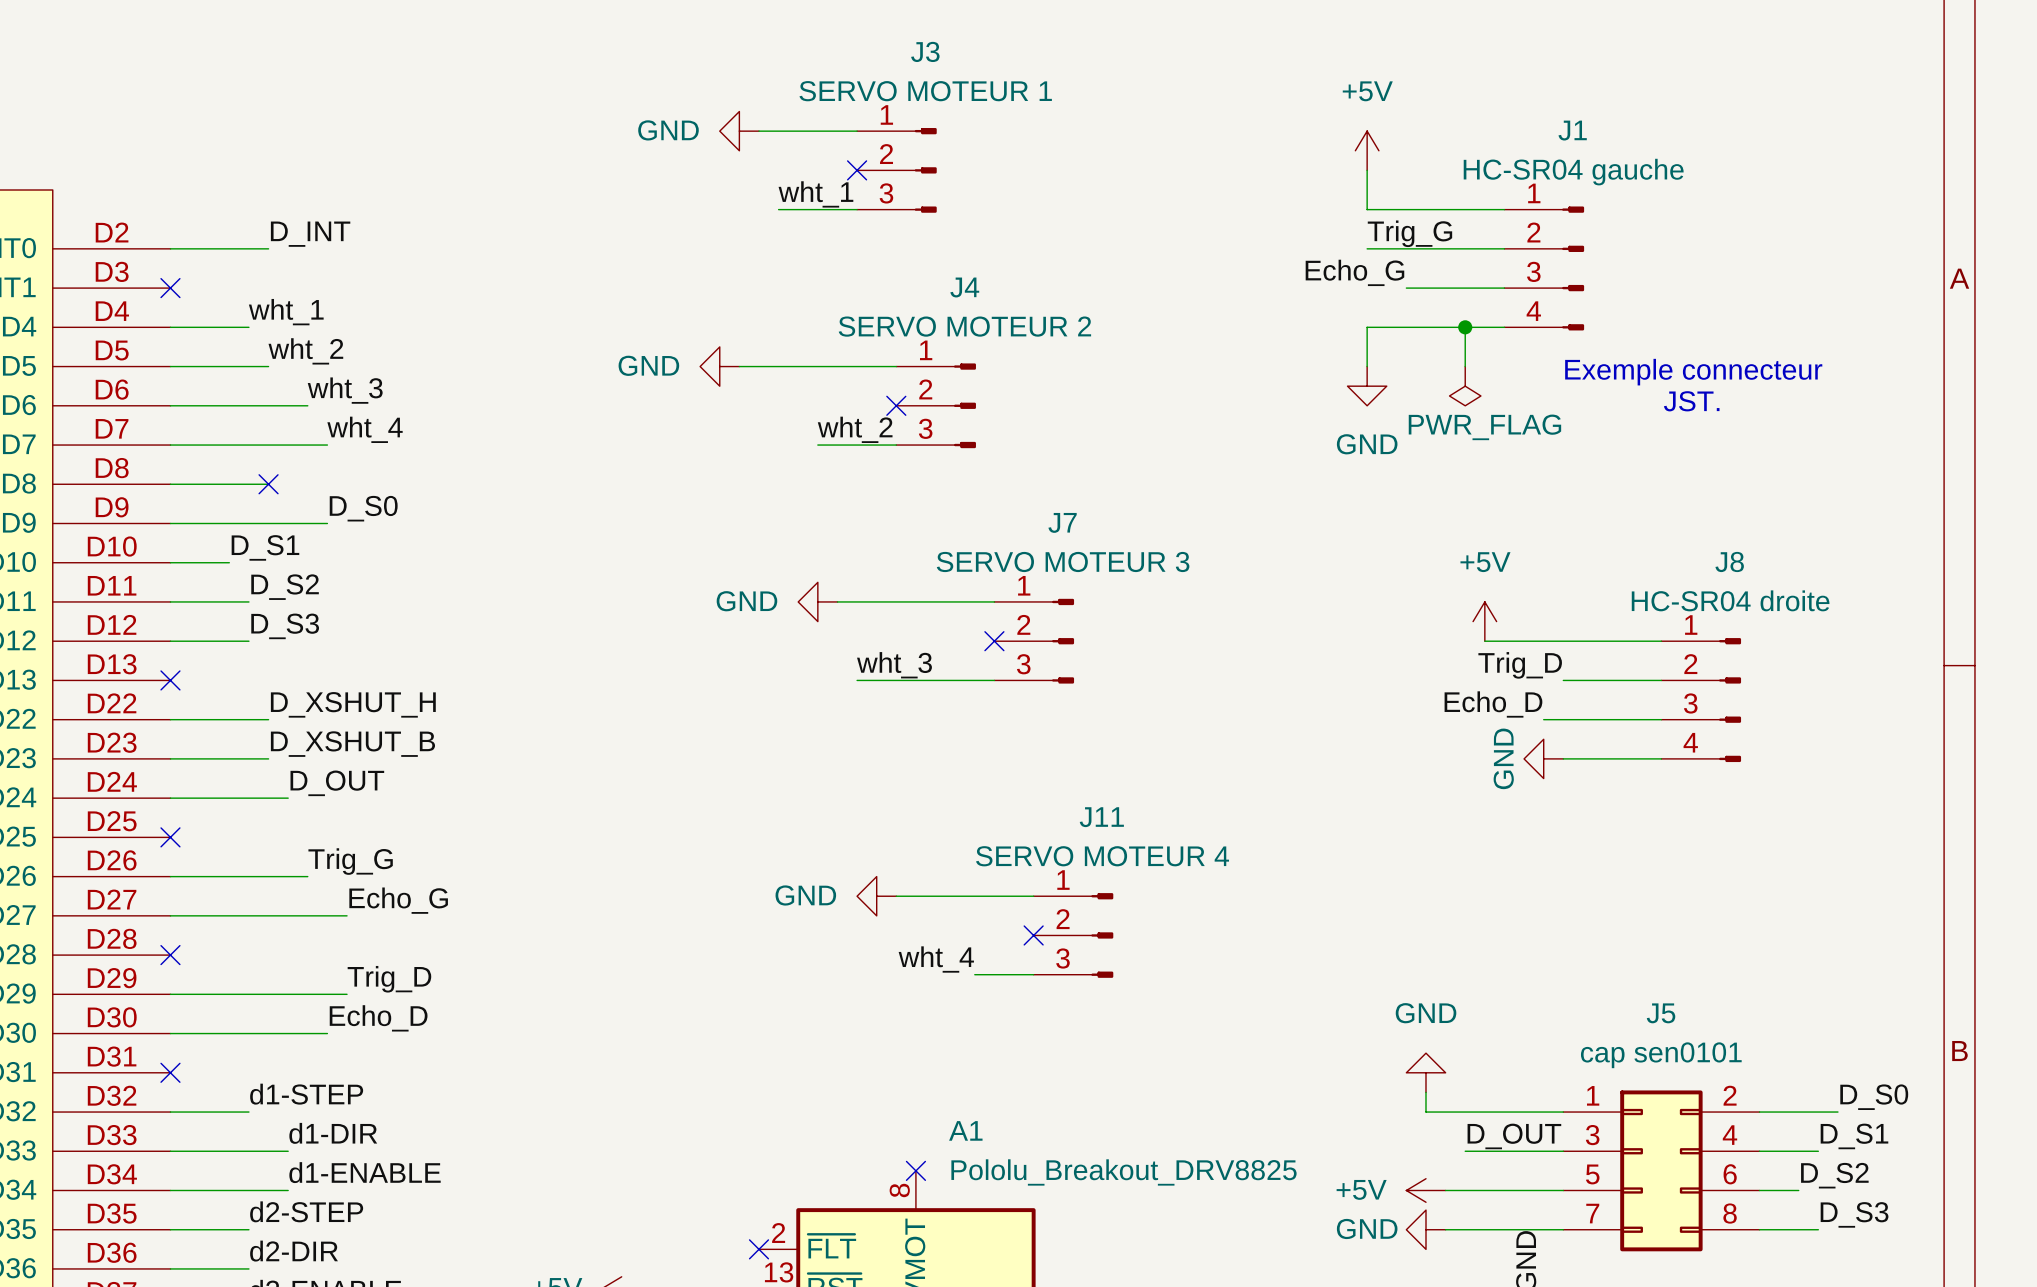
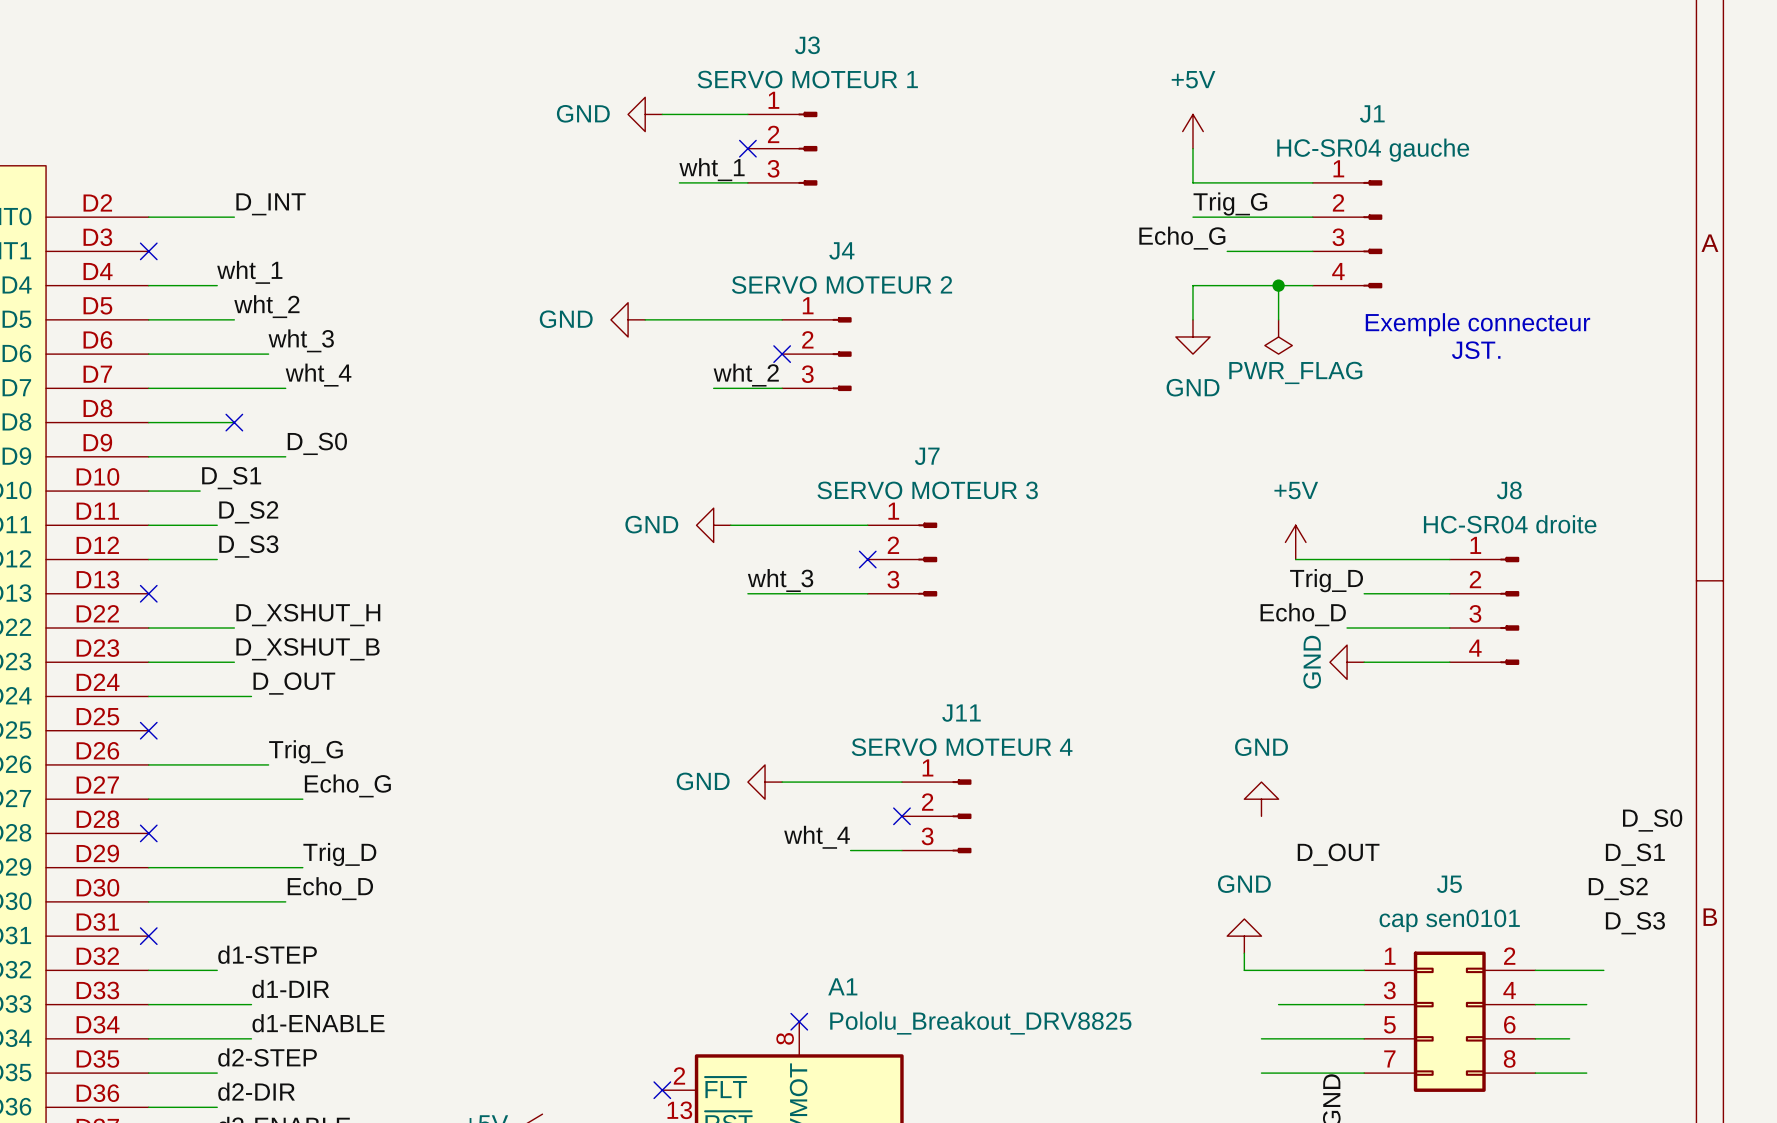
label position: D_S0 (1874, 1097) -> D_S0 (1652, 820)
label position: D_OUT (1514, 1136) -> D_OUT (1338, 854)
label position: D_S1 (1854, 1136) -> D_S1 (1635, 854)
label position: D_S2 (1834, 1175) -> D_S2 (1618, 888)
power symbol: +5V (1425, 1190) -> none
label position: D_S3 (1854, 1214) -> D_S3 (1635, 923)
power symbol rotation: 0° (1425, 1229) -> 90° clockwise (1261, 799)
power symbol position: GND (1425, 1229) -> GND (1261, 799)

